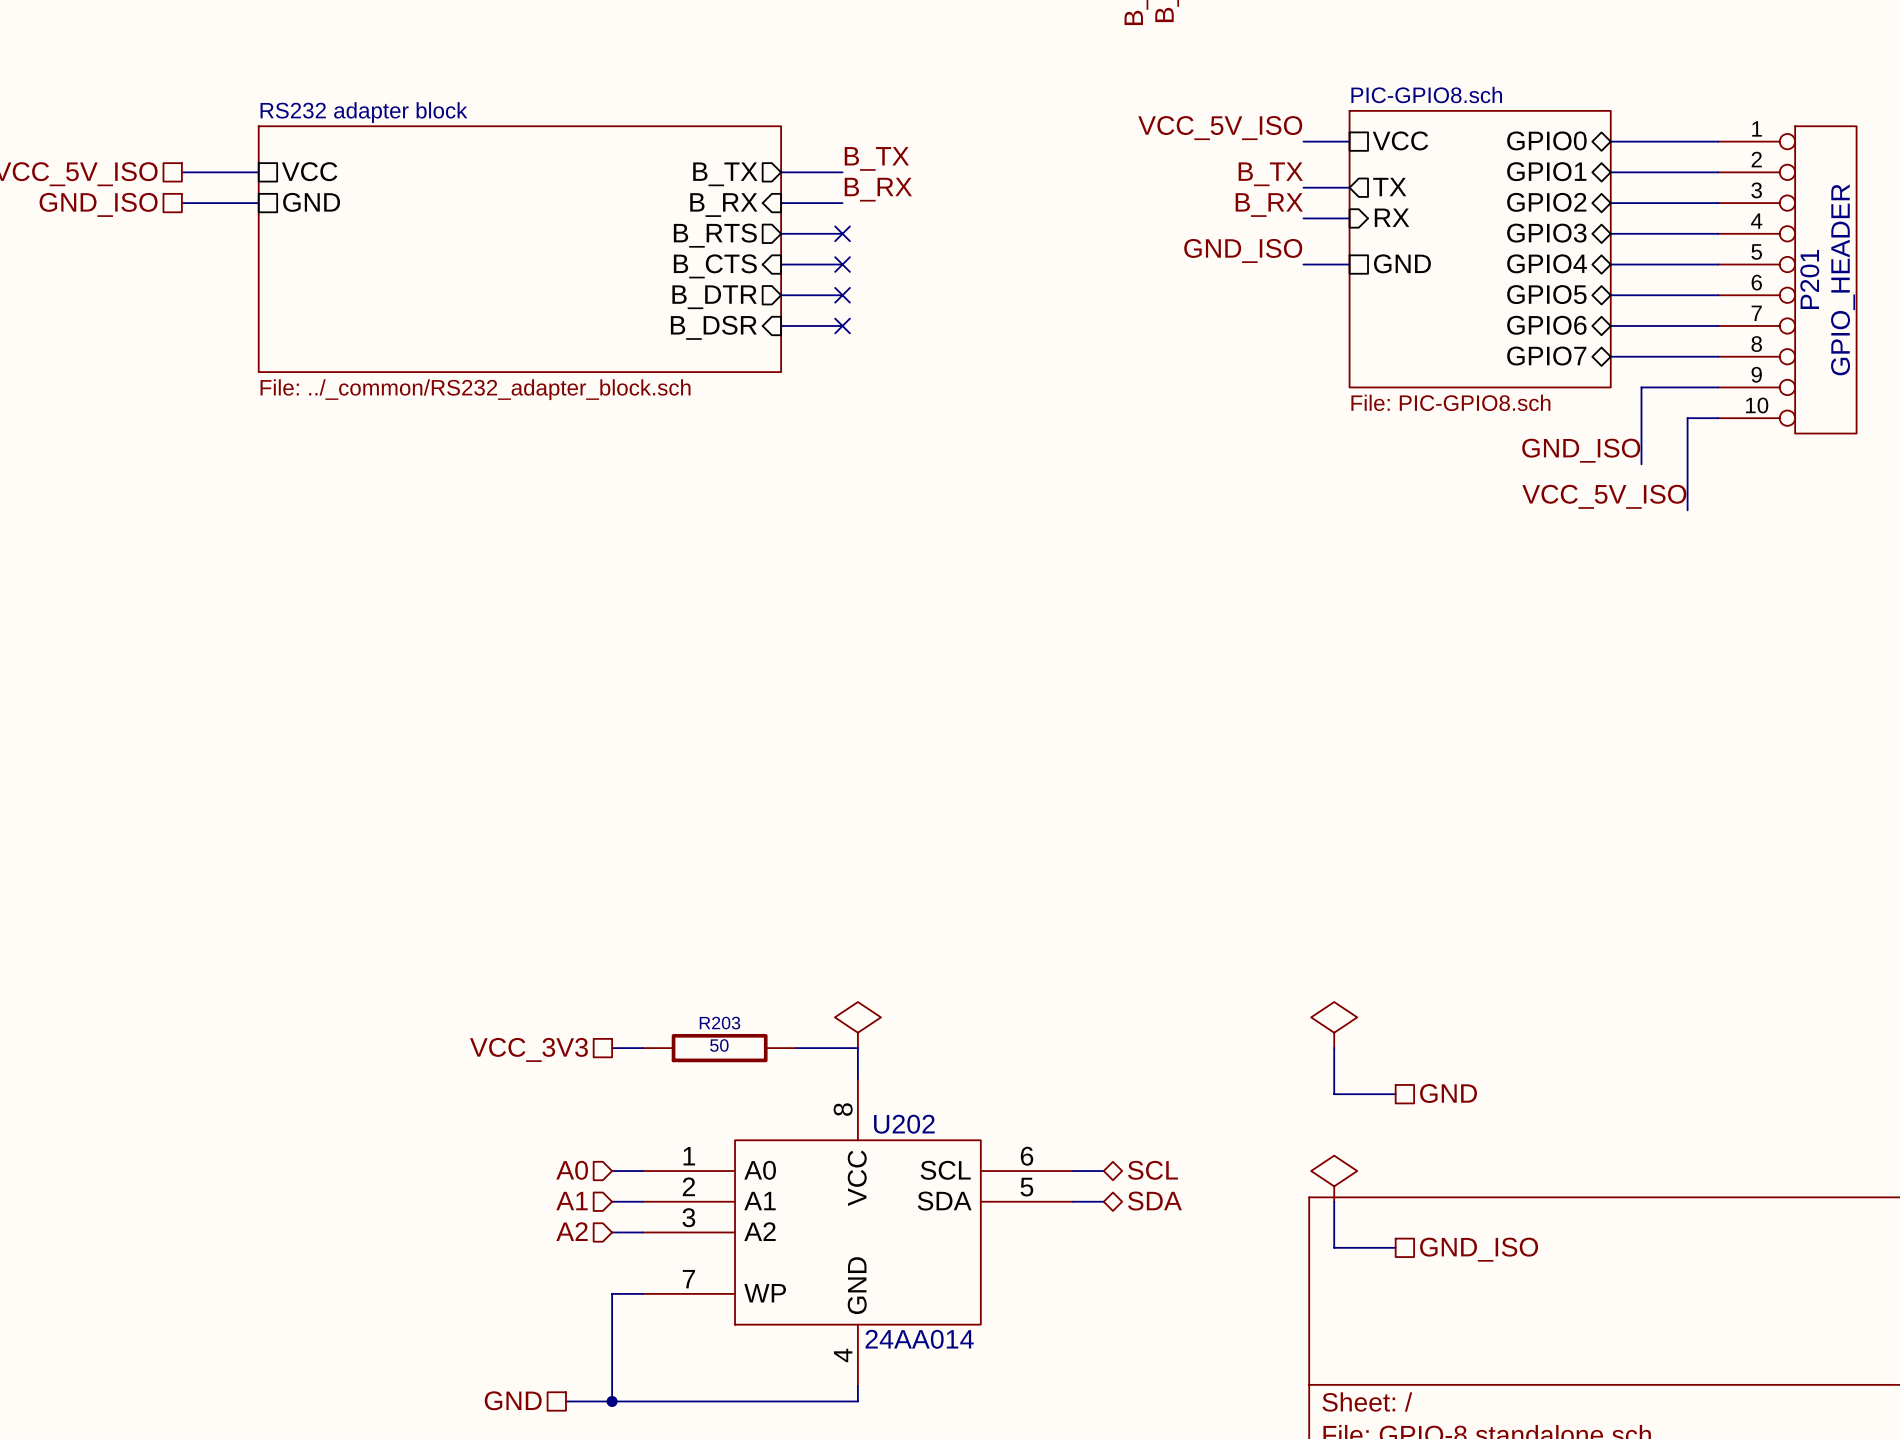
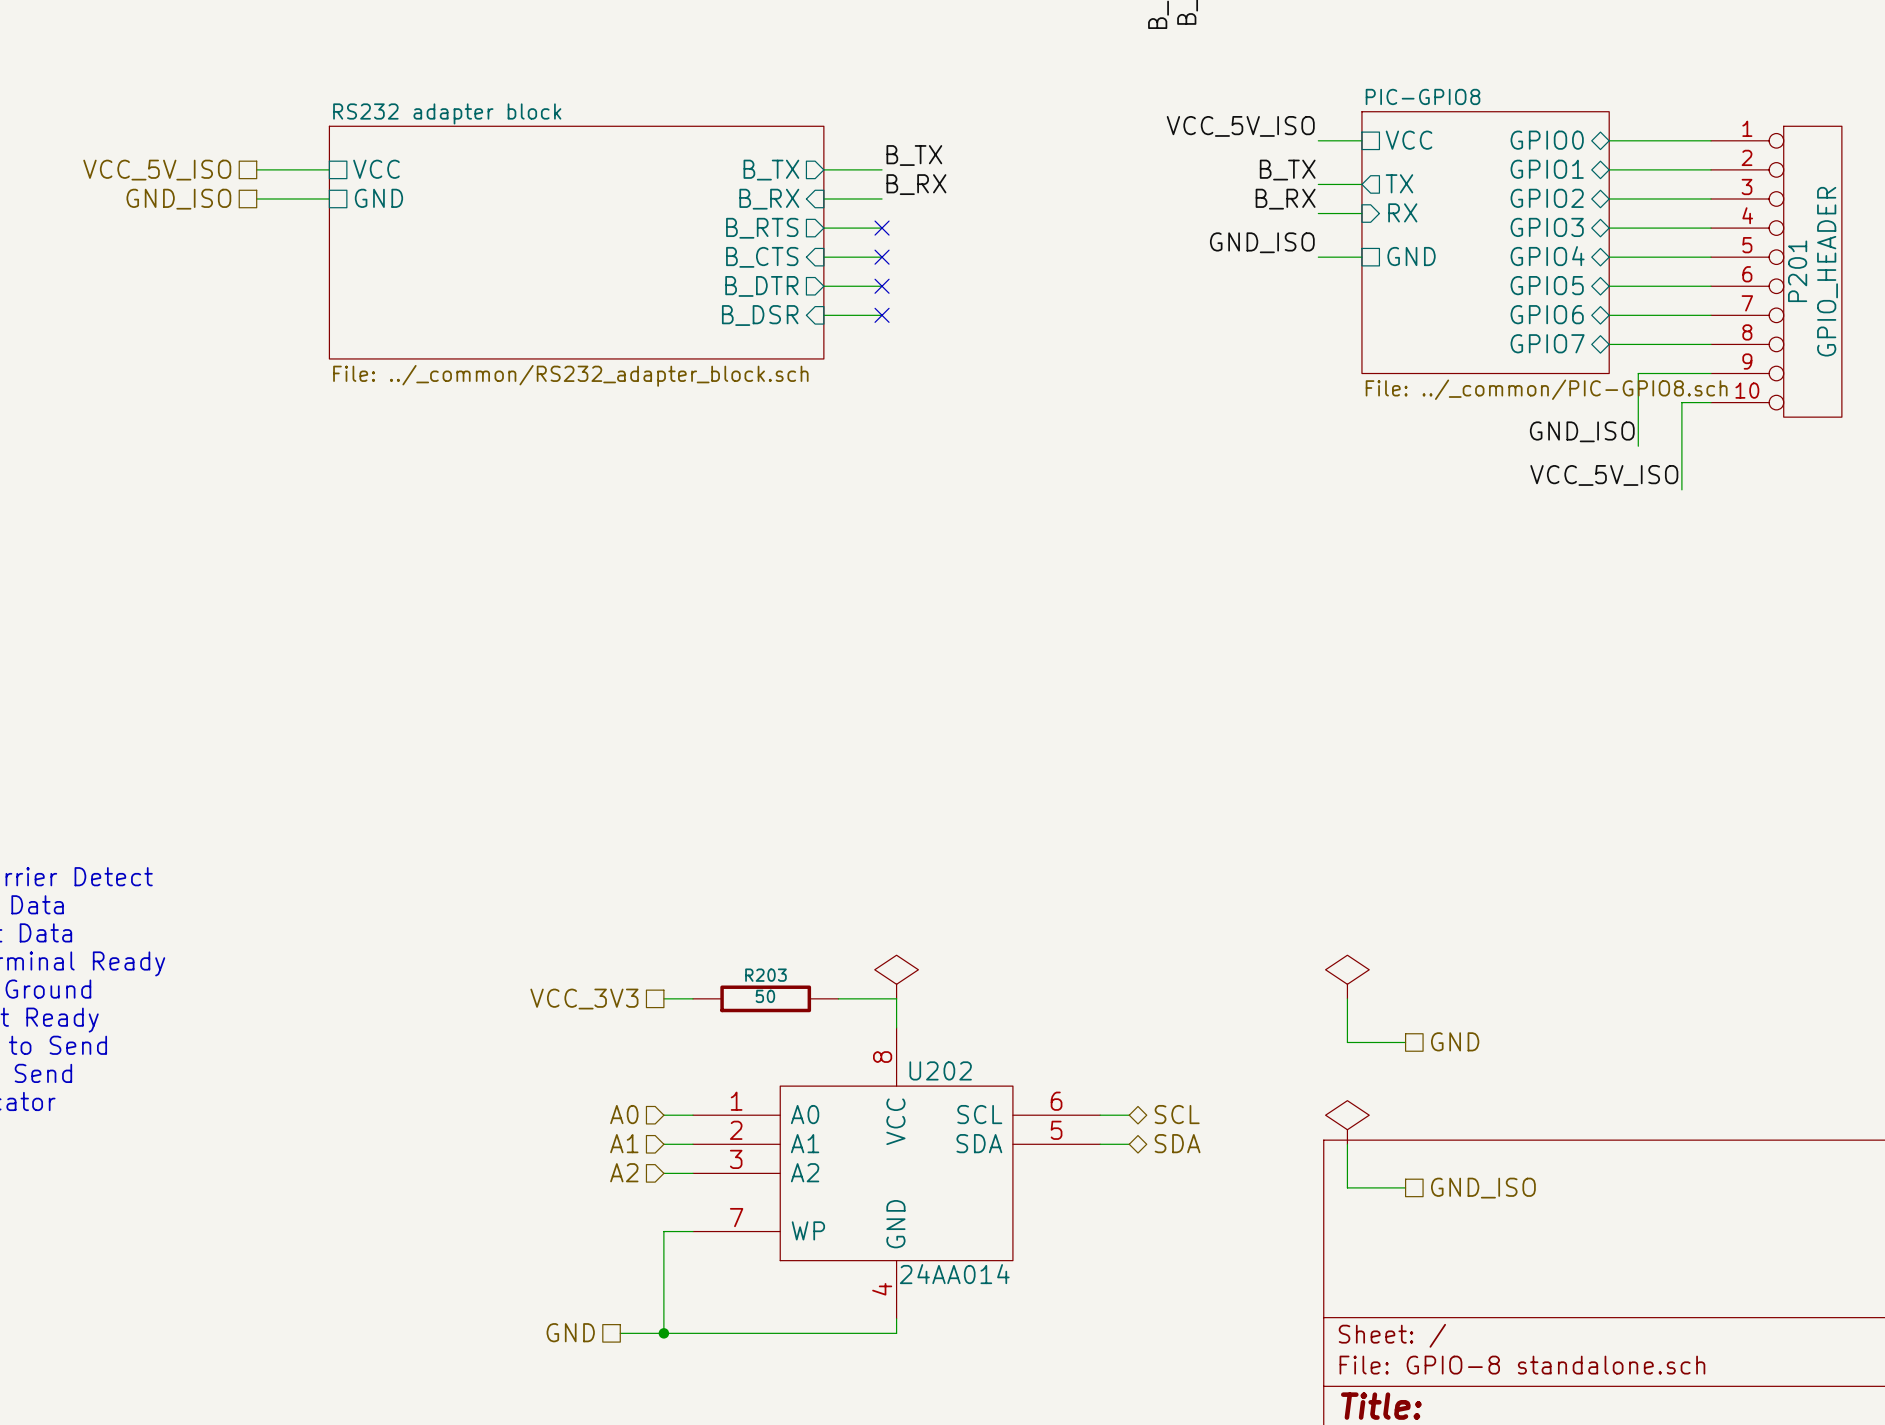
sheet PIC-GPIO8.sch name: PIC-GPIO8.sch (1426, 94) -> PIC-GPIO8 (1423, 96)
sheet PIC-GPIO8.sch value: File: PIC-GPIO8.sch (1450, 402) -> File: ../_common/PIC-GPIO8.sch (1546, 389)

